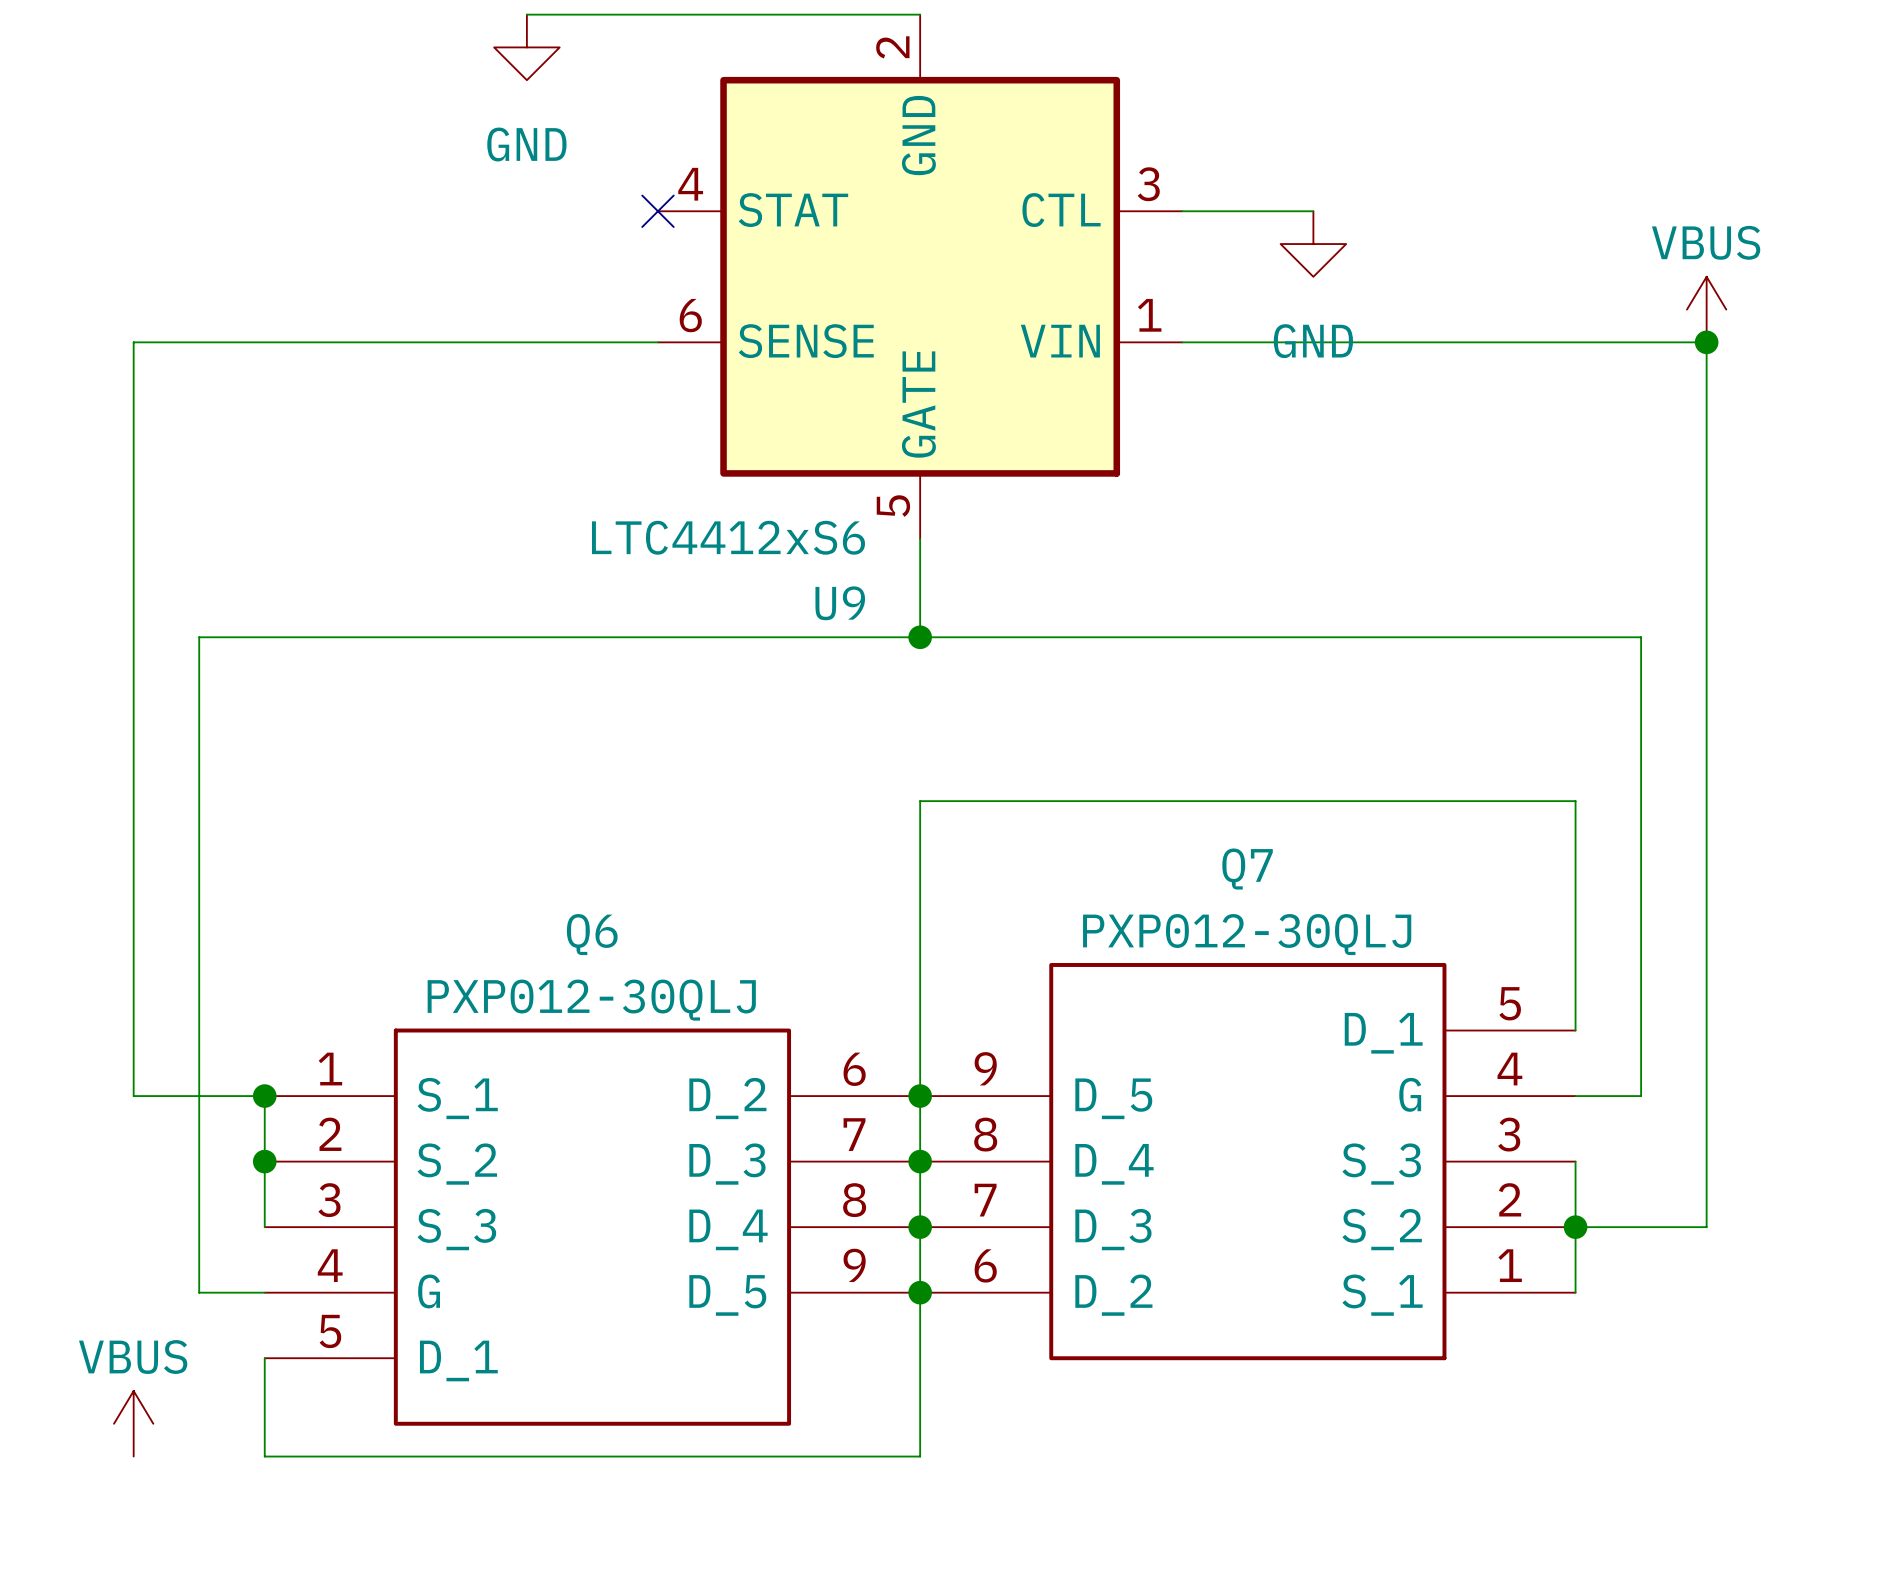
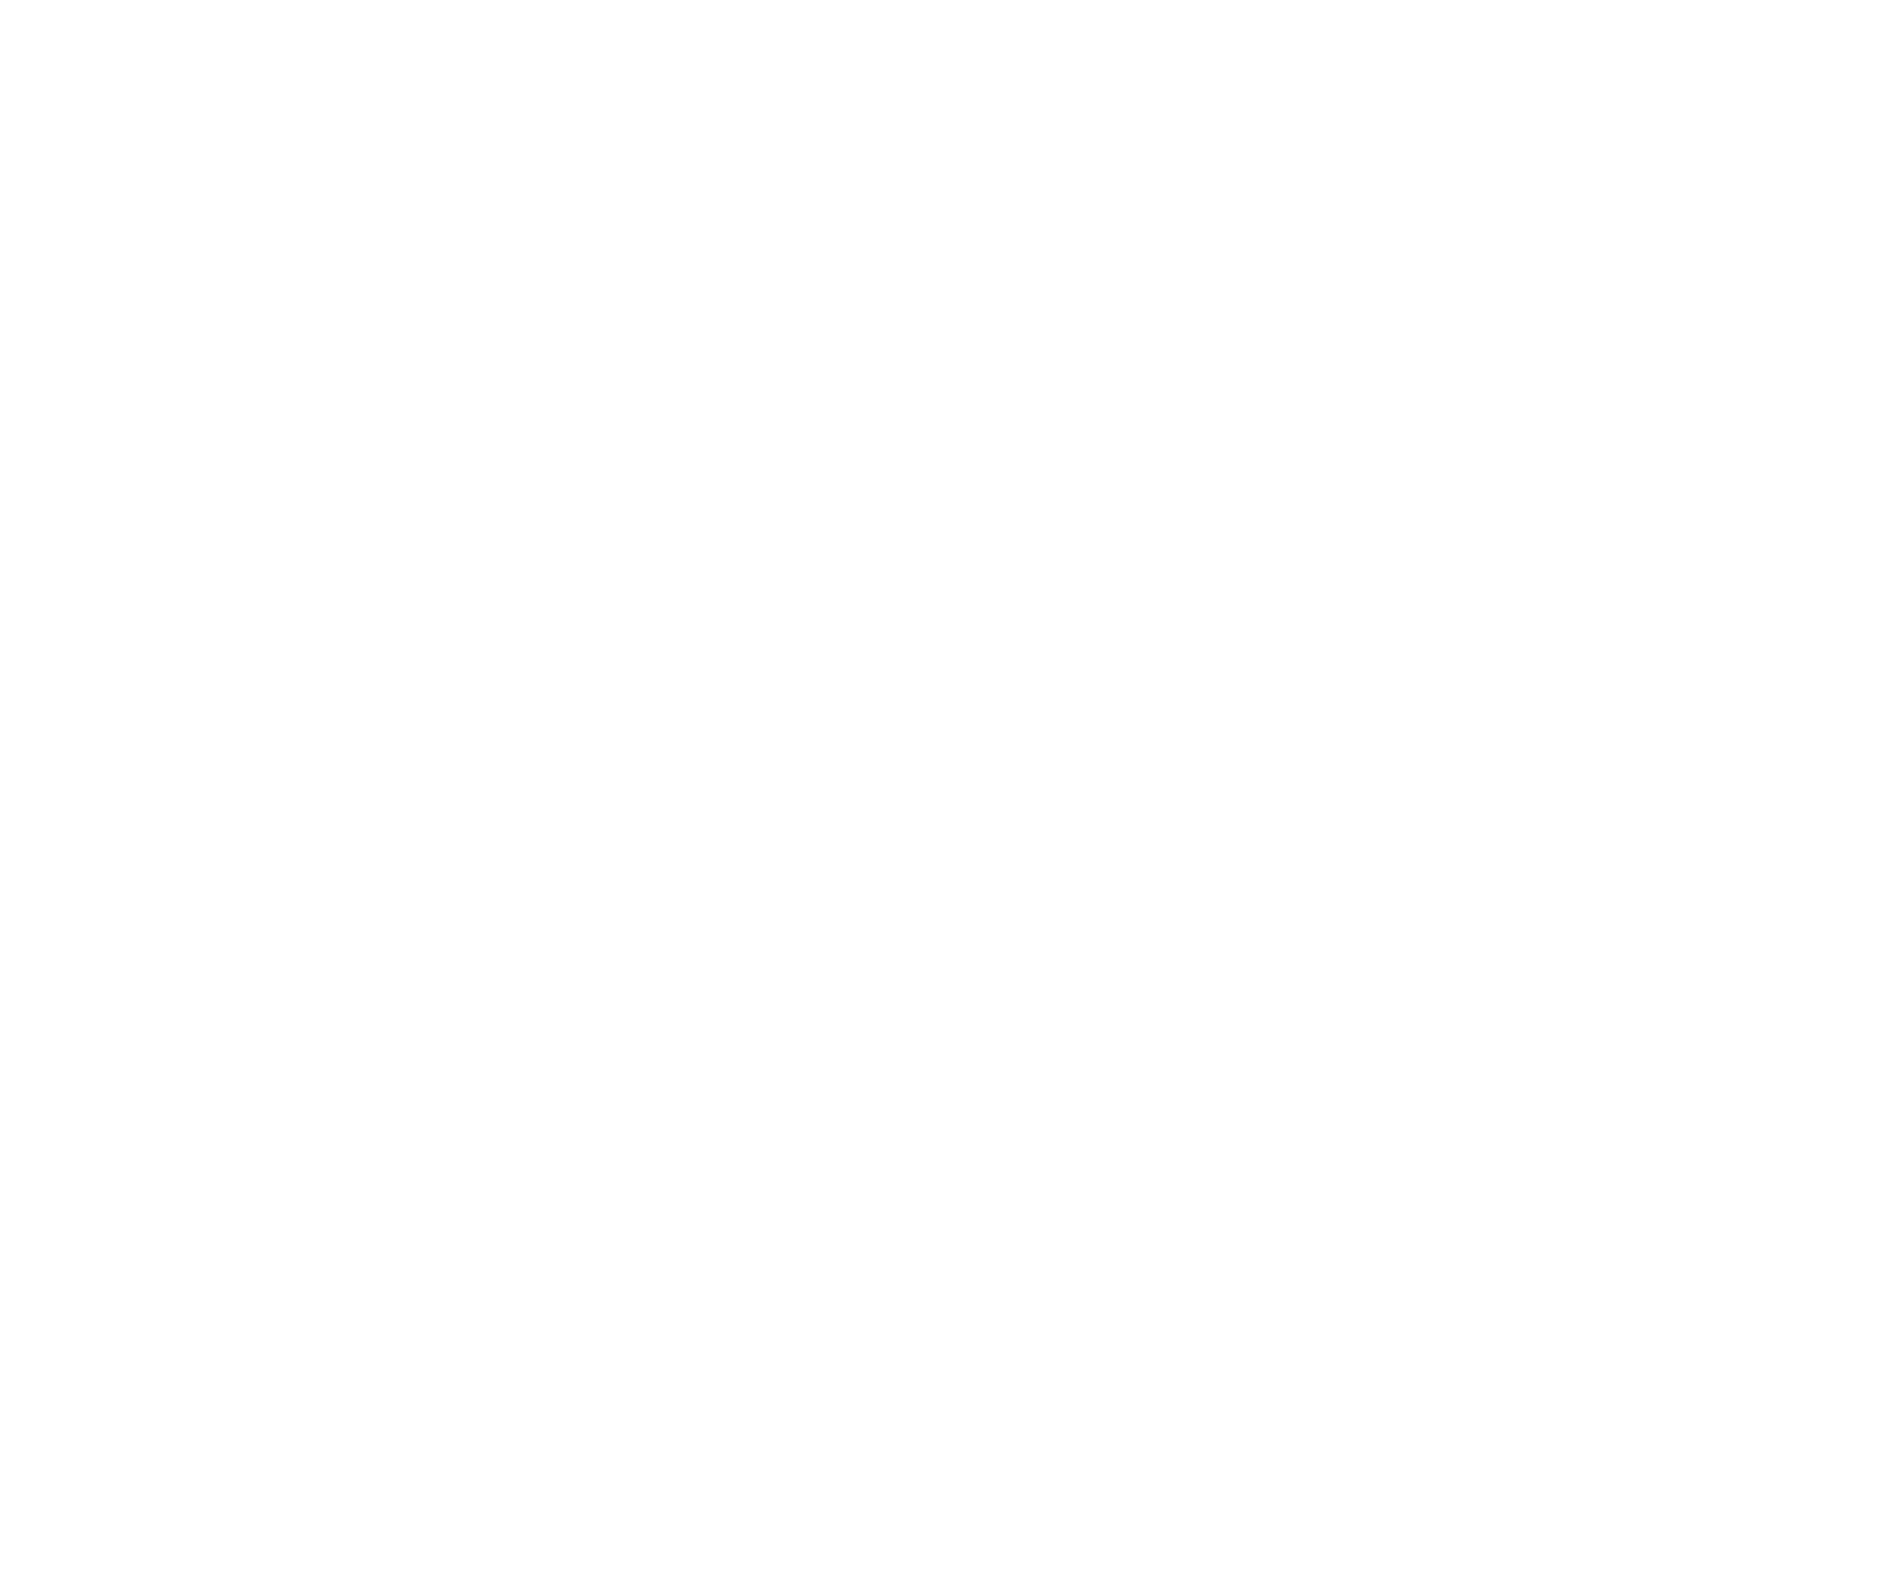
wire: (526, 14) (920, 14) -> none
power symbol: GND (526, 47) -> none
no-connect mark: (657, 211) -> none
wire: (1182, 211) (1313, 211) -> none
power symbol: GND (1313, 244) -> none
U9: LTC4412xS6 (920, 276) -> none
power symbol: VBUS (1706, 309) -> none
wire: (657, 342) (133, 342) (133, 1096) (264, 1096) (264, 1227) -> none
wire: (1182, 342) (1706, 342) (1706, 1227) (1575, 1227) -> none
junction: (1706, 342) -> none
wire: (920, 538) (920, 637) -> none
junction: (920, 637) -> none
wire: (1575, 1030) (1575, 801) (920, 801) (920, 1456) (264, 1456) (264, 1358) -> none
junction: (264, 1096) -> none
junction: (920, 1096) -> none
wire: (1575, 1096) (1641, 1096) (1641, 637) (199, 637) (199, 1292) (264, 1292) -> none
junction: (264, 1161) -> none
junction: (920, 1161) -> none
Q7: PXP012-30QLJ (1247, 1161) -> none
wire: (1575, 1161) (1575, 1292) -> none
Q6: PXP012-30QLJ (592, 1227) -> none
junction: (920, 1227) -> none
junction: (1575, 1227) -> none
junction: (920, 1292) -> none
power symbol: VBUS (133, 1423) -> none

